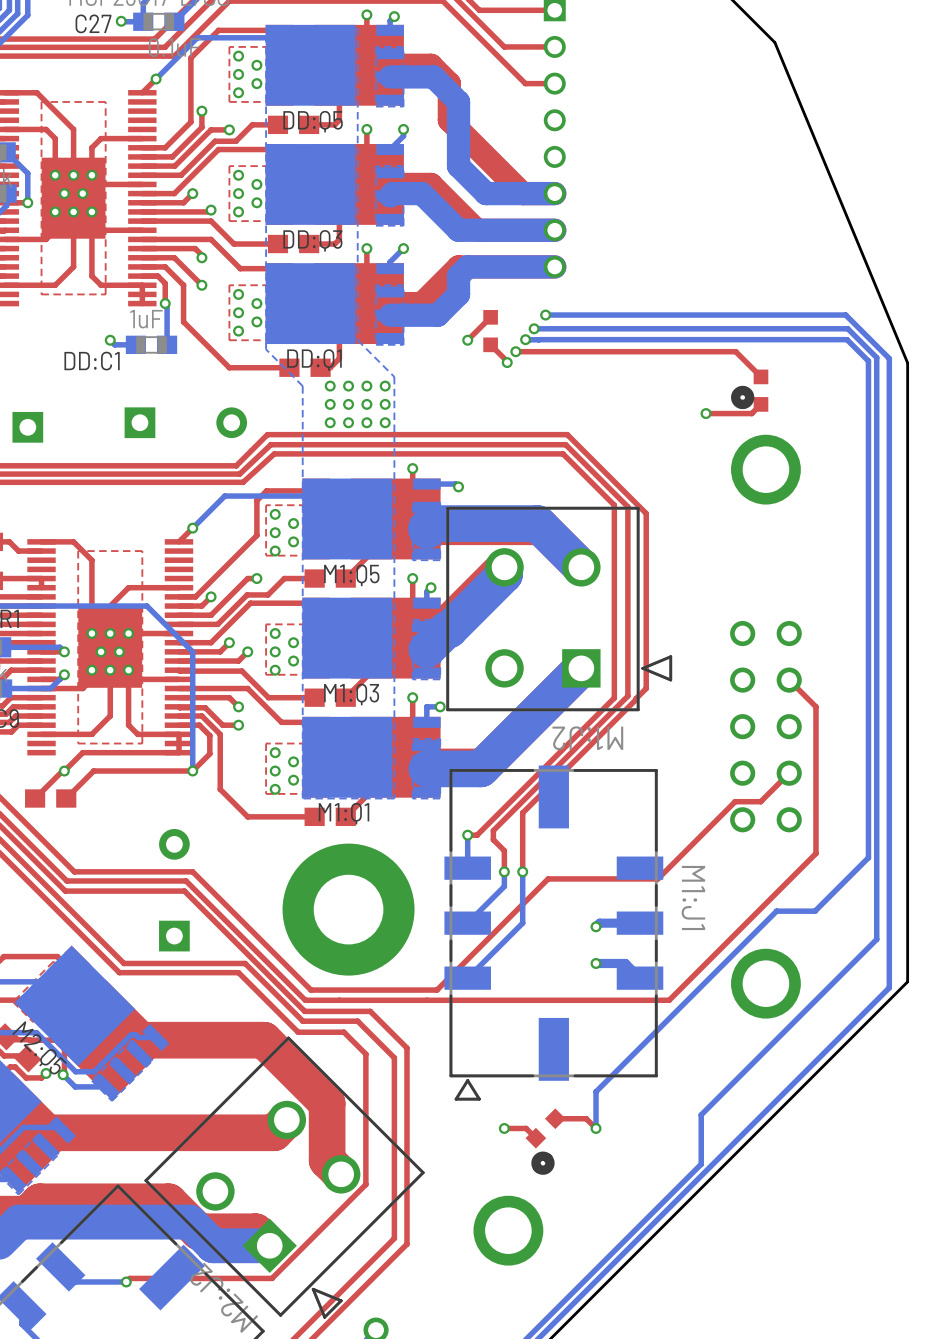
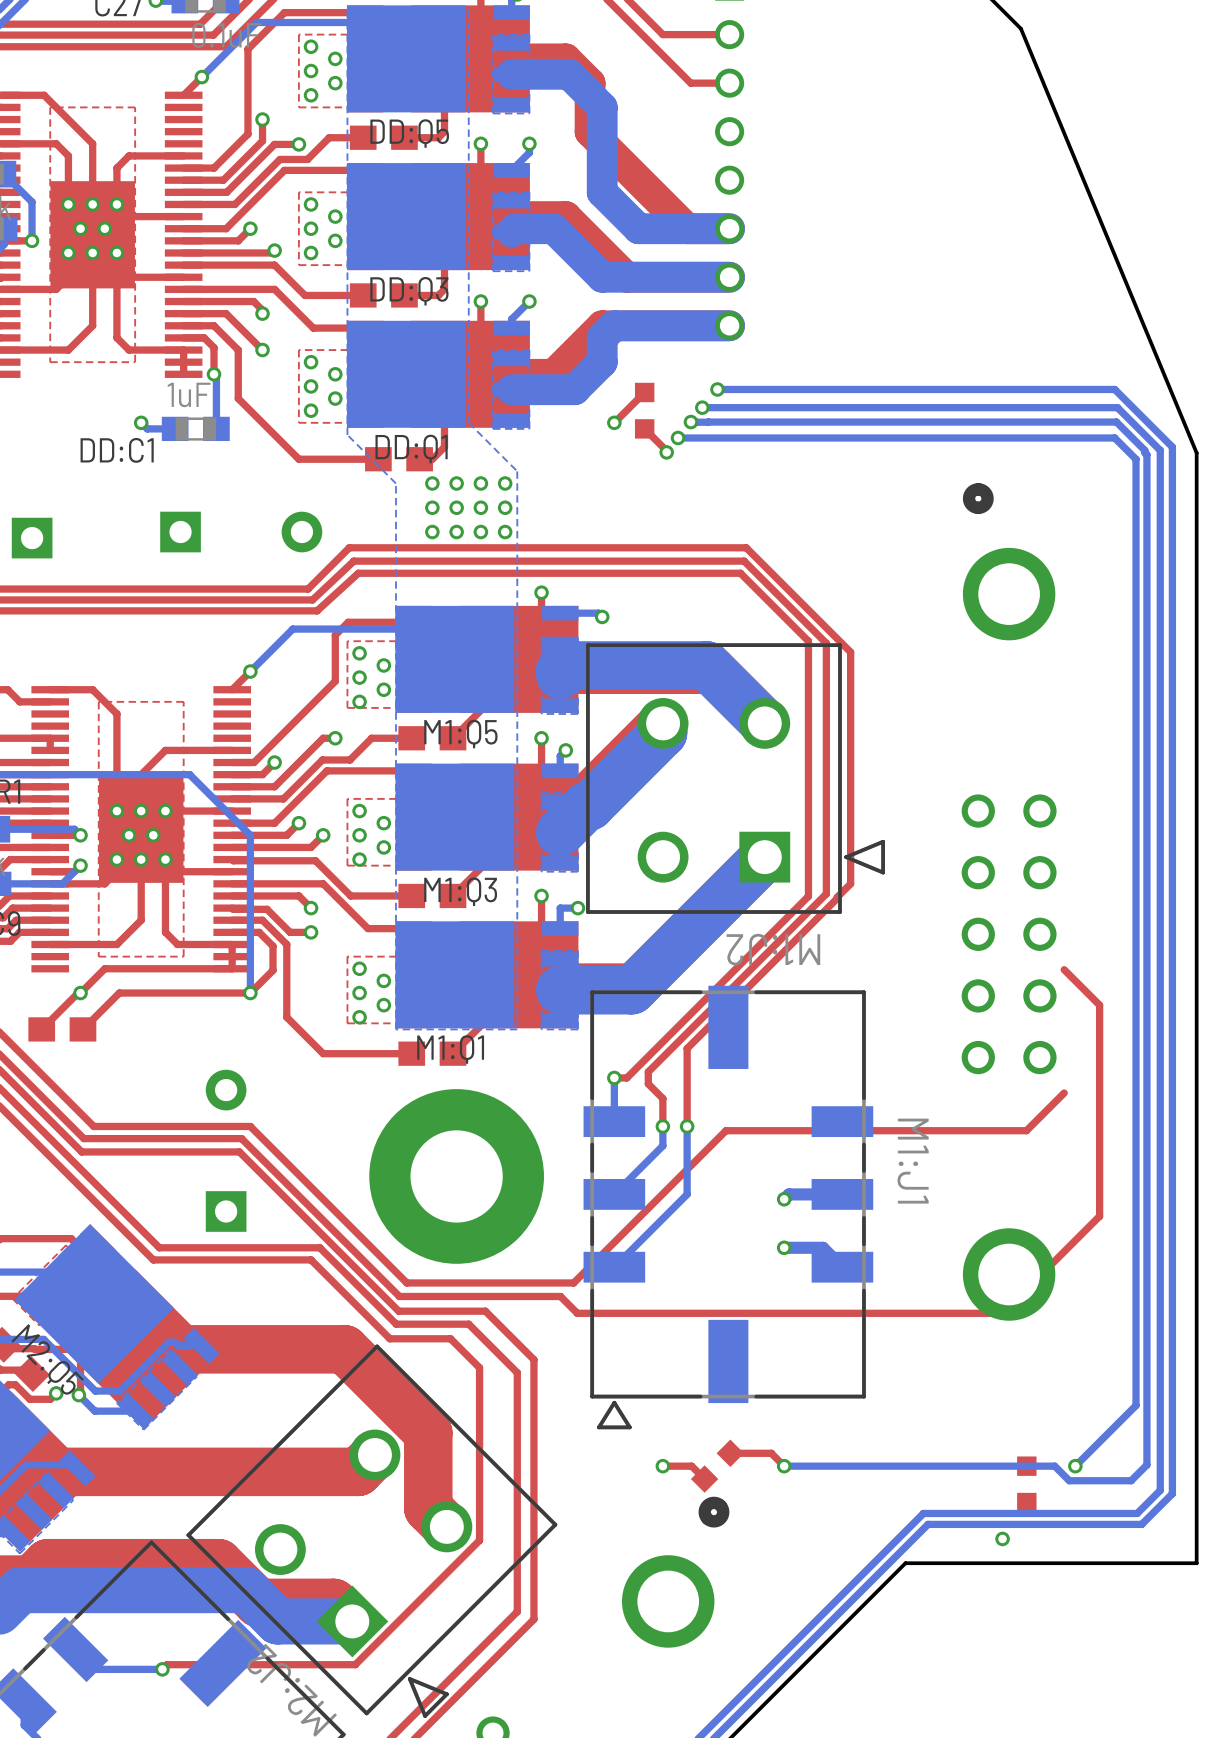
top track: (515, 351) (735, 351) (760, 376) -> none
bottom track: none -> (678, 438) (1114, 438) (1136, 459) (1136, 1405) (1075, 1466)
bottom track: (876, 357) (876, 939) (701, 1114) (701, 1164) -> (1155, 445) (1160, 450) (1160, 1490) (1137, 1513) (923, 1513)
bottom track: (868, 362) (868, 857) (815, 911) (776, 911) (596, 1091) (596, 1128) -> (1144, 452) (1146, 454) (1146, 1464) (1131, 1480) (1069, 1480) (1054, 1466) (784, 1466)
part: (760, 390) -> none
top track: (760, 404) (751, 413) (706, 413) -> none
via: (706, 413) -> none
top track: (789, 680) (815, 706) (815, 853) (669, 1000) (427, 1000) -> (1064, 969) (1099, 1005) (1099, 1216) (1002, 1313) (577, 1313) (560, 1296)
top track: (789, 773) (760, 801) (735, 801) (657, 878) (548, 878) -> (1064, 1092) (1026, 1130) (725, 1130) (720, 1135)
board edge: (907, 981) (687, 1201) -> (1196, 1272) (1196, 1563) (905, 1563)
bottom track: (889, 987) (704, 1172) -> (1172, 1279) (1172, 1493) (1141, 1524) (927, 1524)
via: none -> (1075, 1466)
part: none -> (1026, 1484)
via: none -> (1002, 1538)

